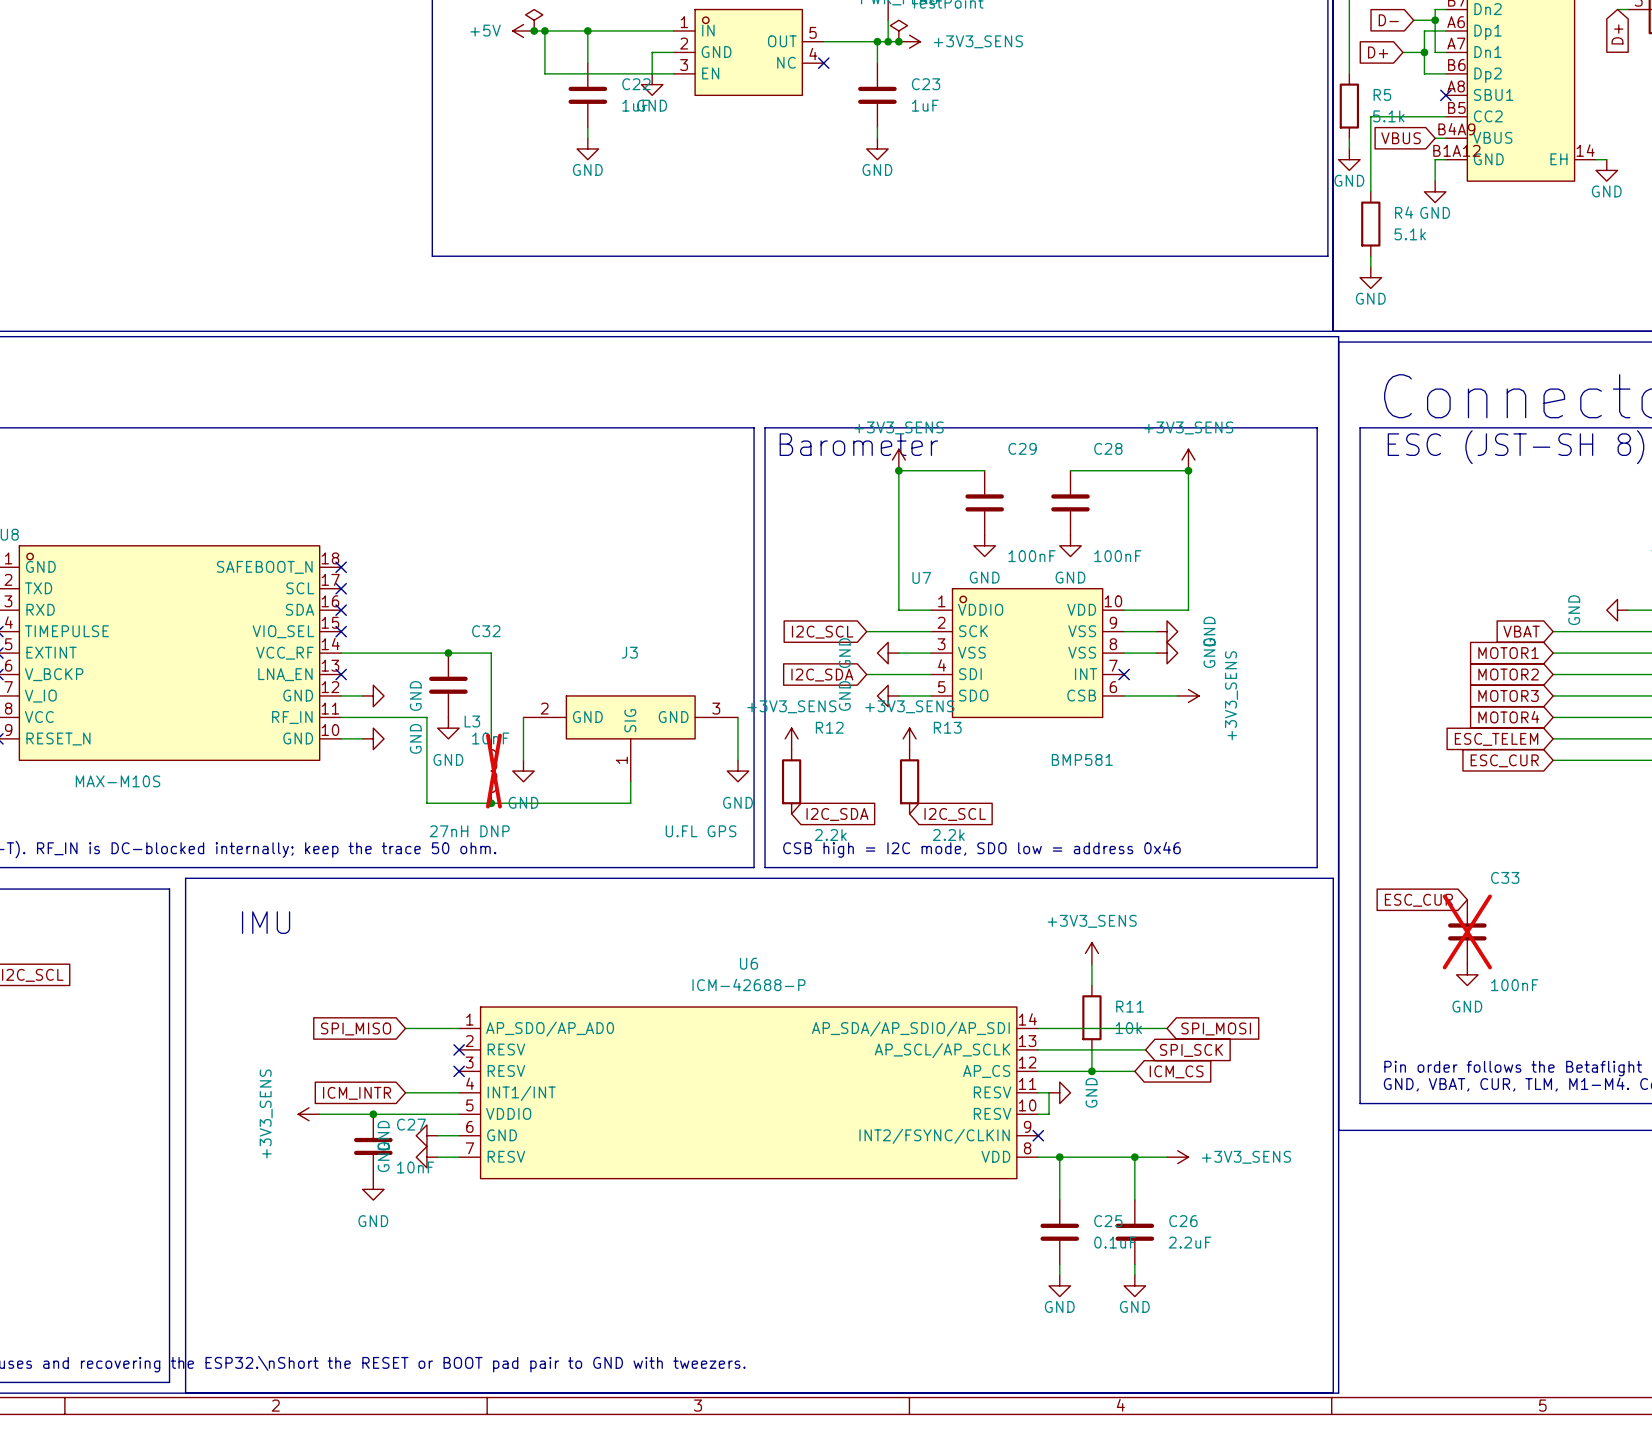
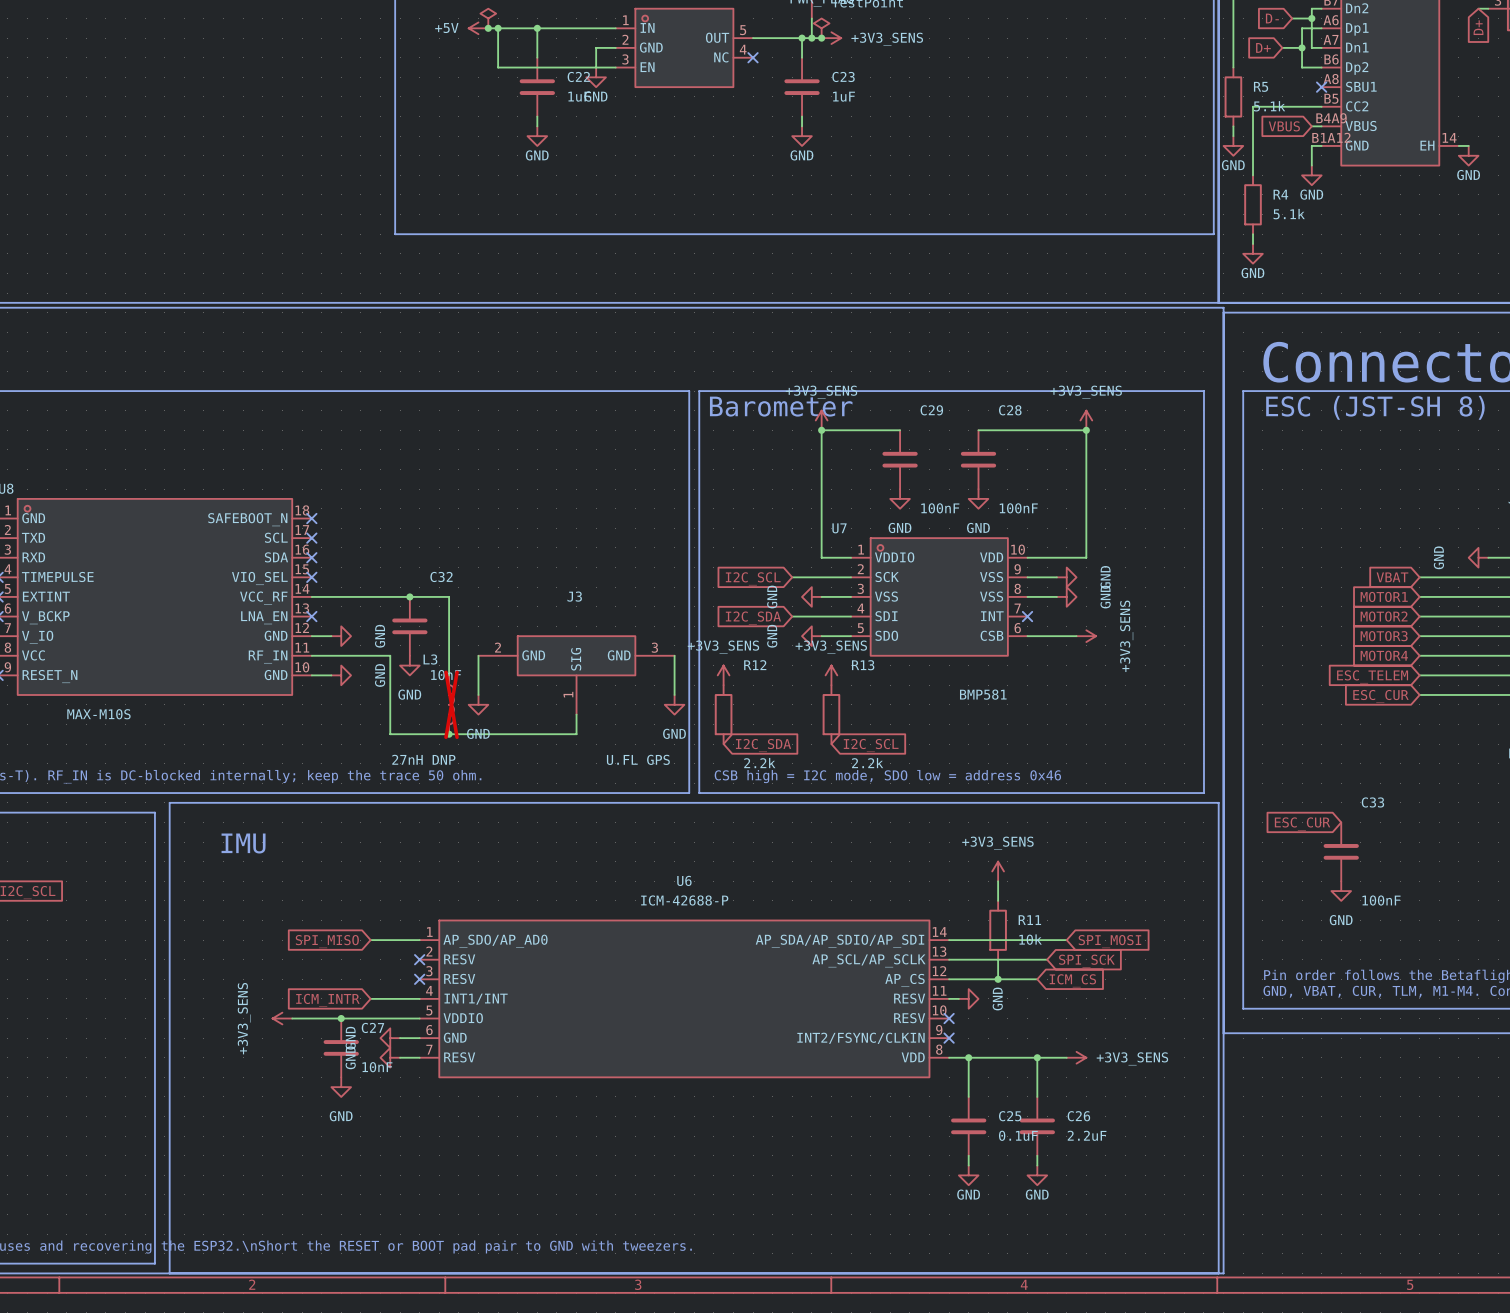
C33 do-not-place cross: (1467, 931) -> none
wire: (1049, 1092) (1049, 1114) (1038, 1114) -> none
no-connect mark: none -> (949, 1018)

